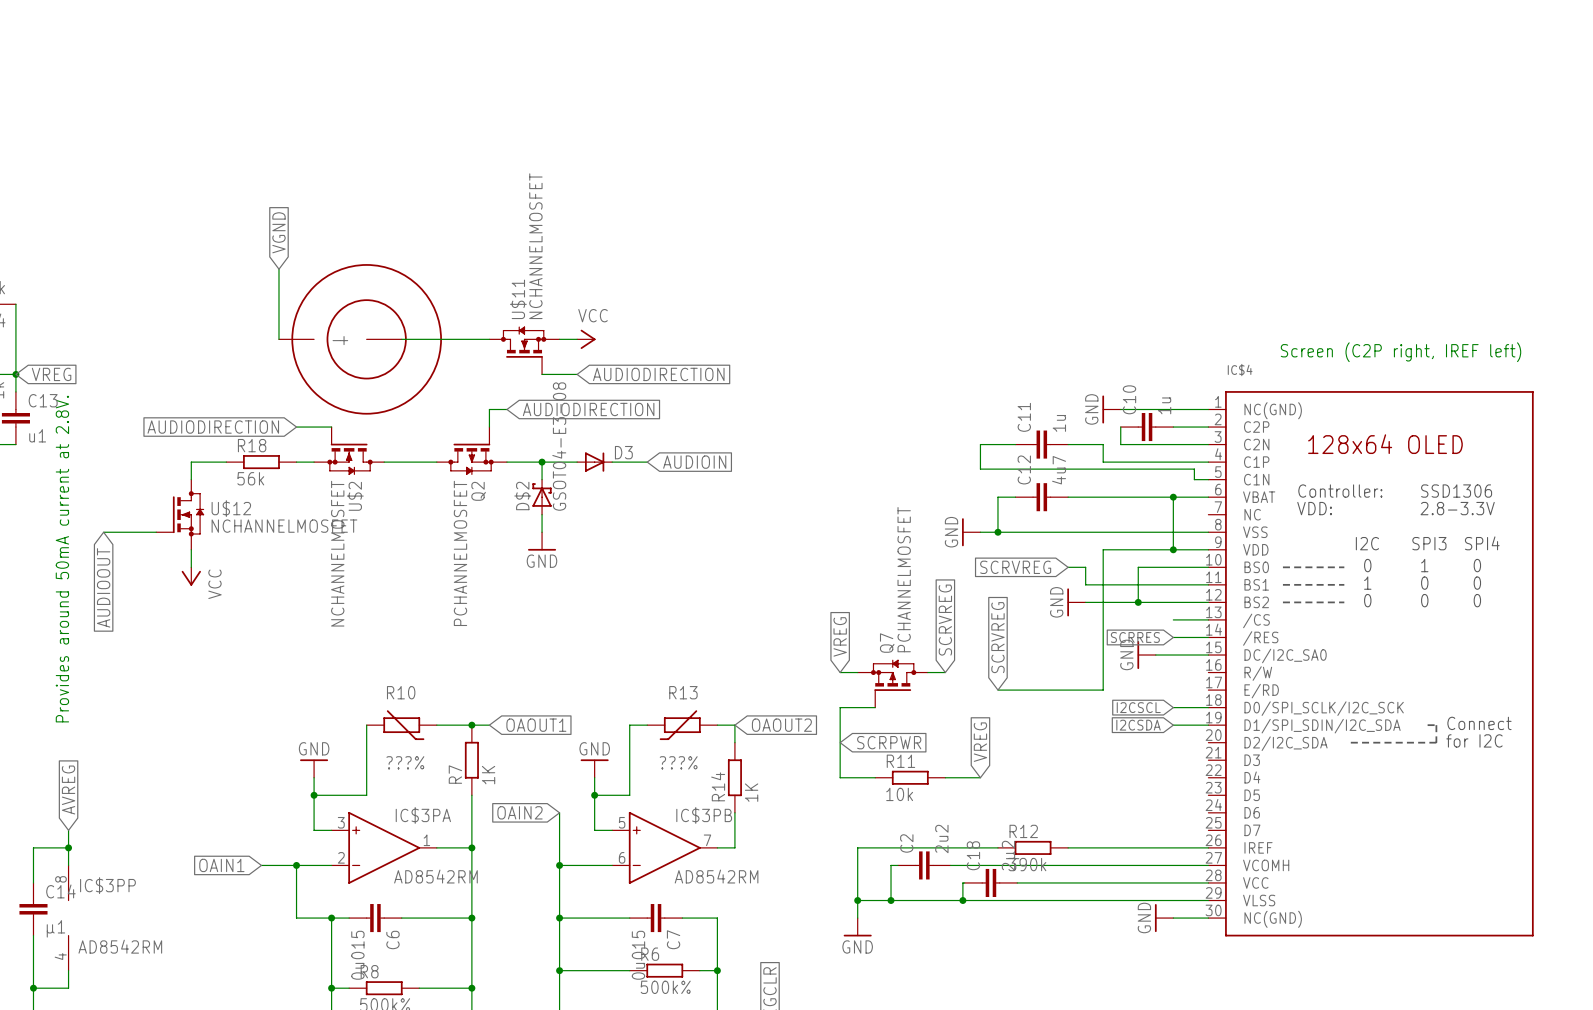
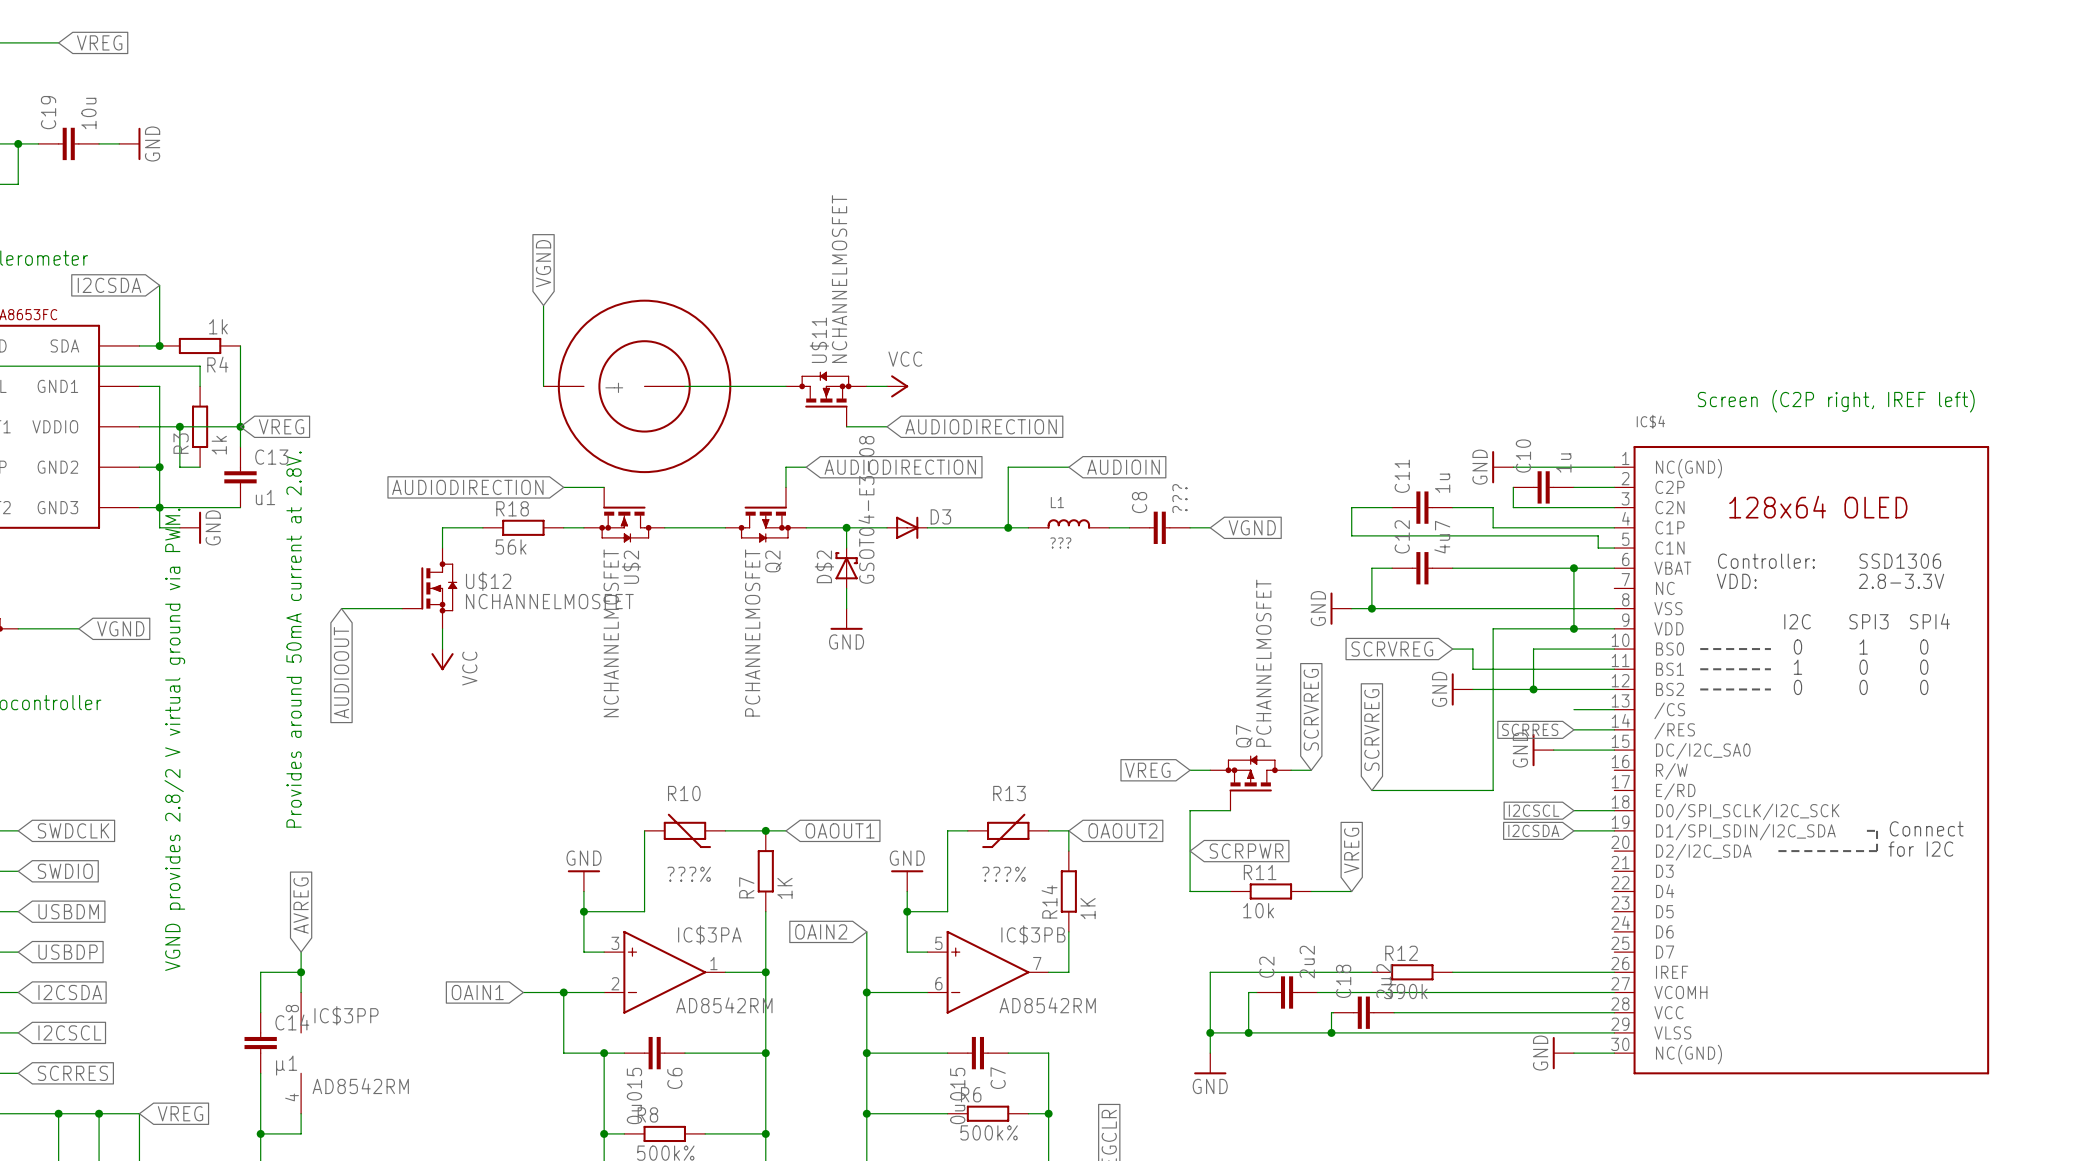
wire: none -> (1068, 467) (1008, 467) (1008, 527)
L1: none -> ??? (1068, 524)
wire: none -> (967, 527) (1028, 527)
junction: none -> (1008, 527)
global label position: AUDIOIN (694, 462) -> AUDIOIN (1123, 467)
wire: none -> (1109, 527) (1129, 527)
C8: none -> ??? (1159, 527)
wire: none -> (1190, 527) (1210, 527)
global label: none -> VGND (1252, 527)
global label rotation: 0° (840, 636) -> 90° counterclockwise (1147, 770)

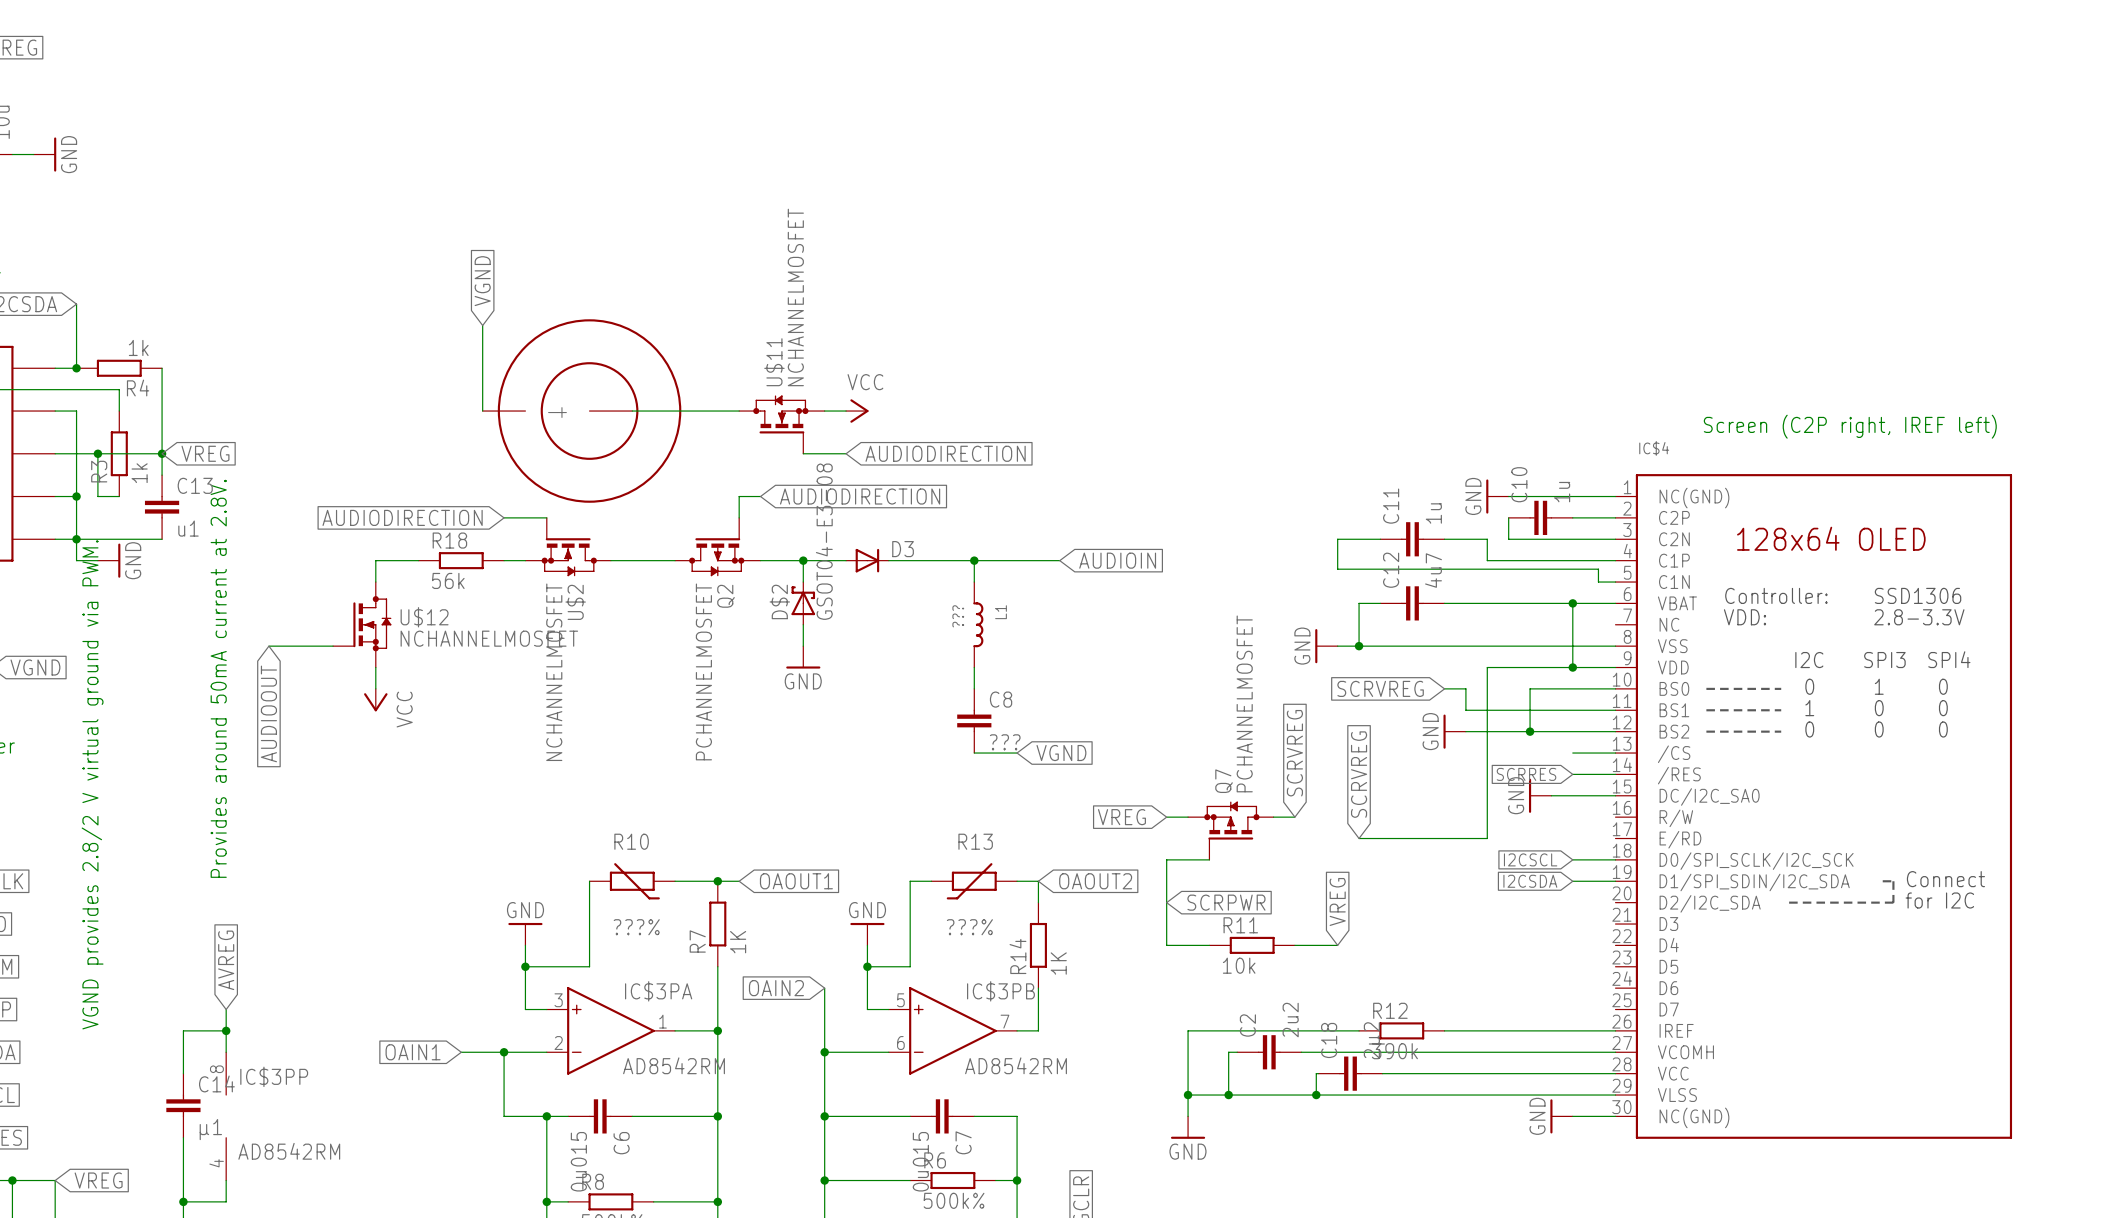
wire: (1068, 467) (1008, 467) (1008, 527) -> (974, 582) (974, 560)
global label position: AUDIOIN (1123, 467) -> AUDIOIN (1117, 560)
L1 rotation: 0° (1068, 524) -> 90° clockwise (978, 624)
L1 position: (1068, 524) -> (978, 624)
wire: none -> (995, 560) (1059, 560)
wire: (1109, 527) (1129, 527) -> none
C8 rotation: 0° (1159, 527) -> 90° clockwise (974, 720)
C8 position: (1159, 527) -> (974, 720)
wire: (1190, 527) (1210, 527) -> none
global label: VGND (1252, 527) -> none
wire: none -> (974, 667) (974, 688)
wire: none -> (974, 753) (1017, 753)
global label: none -> VGND (1061, 753)

